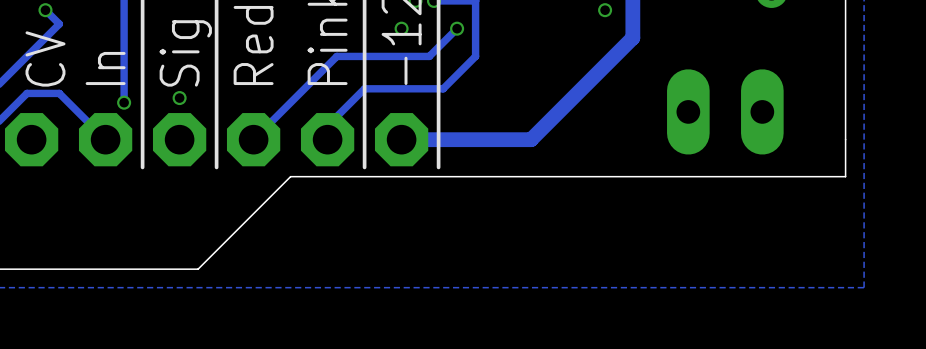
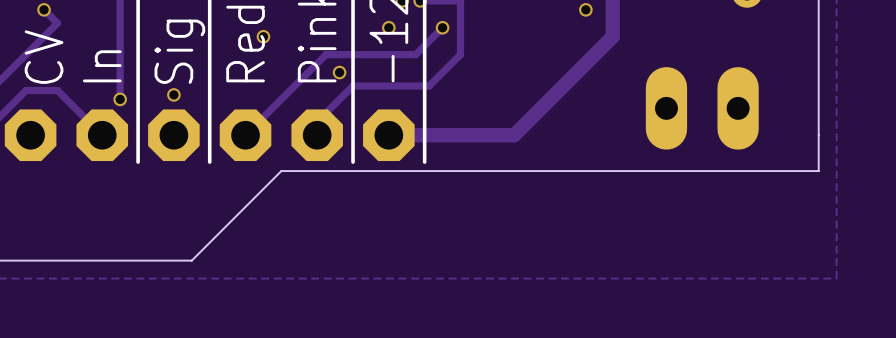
via: none -> (263, 36)
via: none -> (339, 72)

